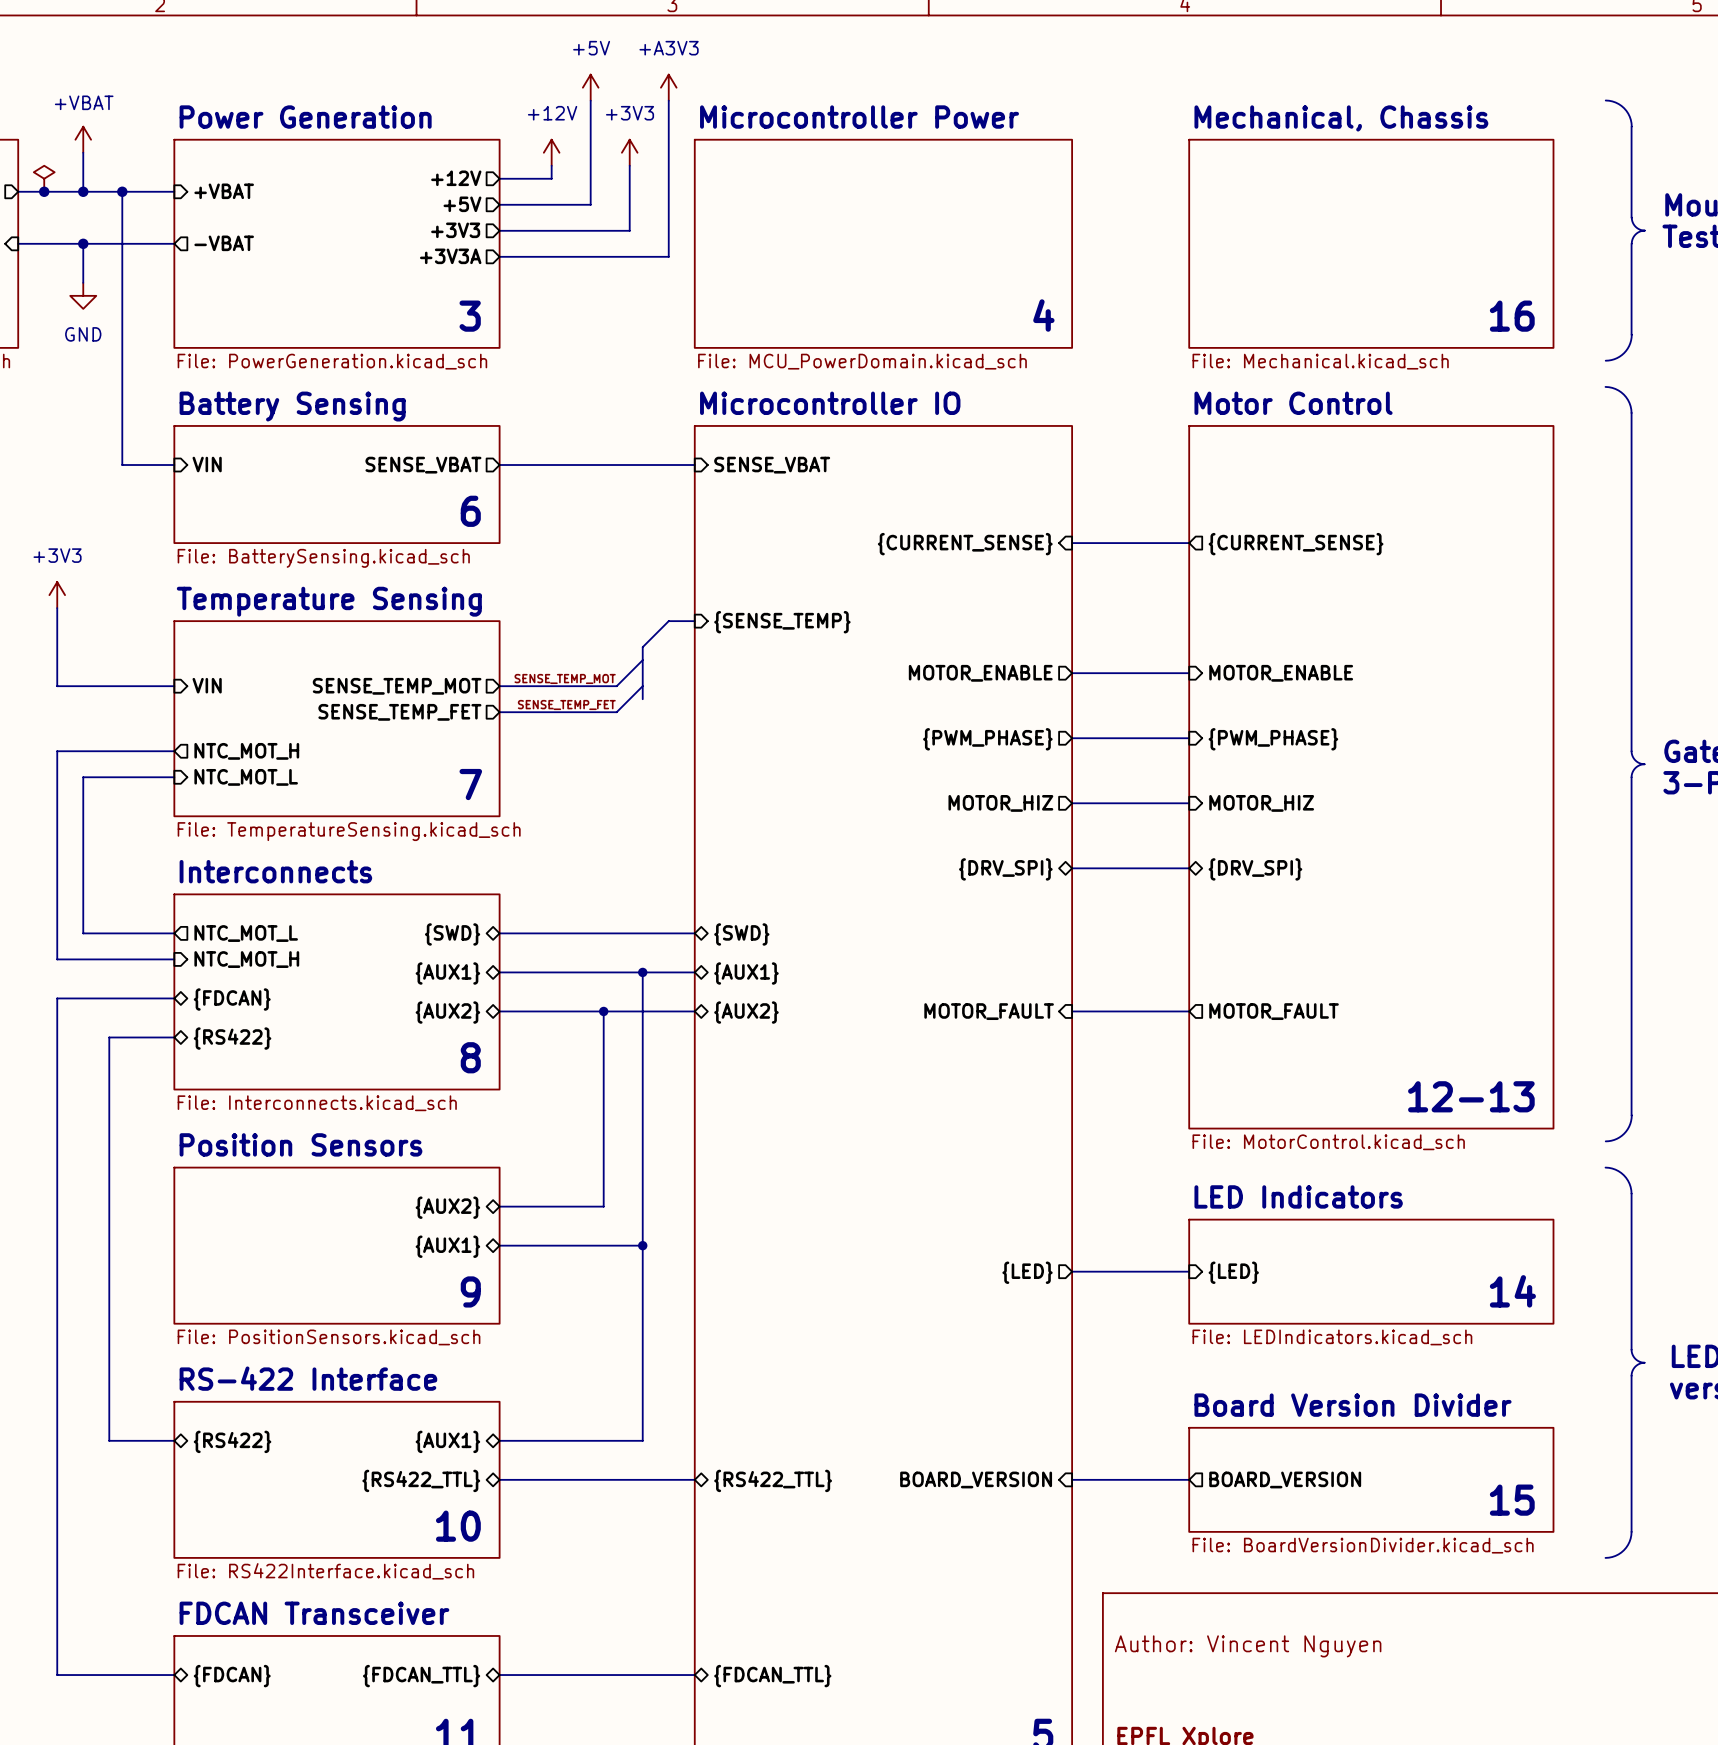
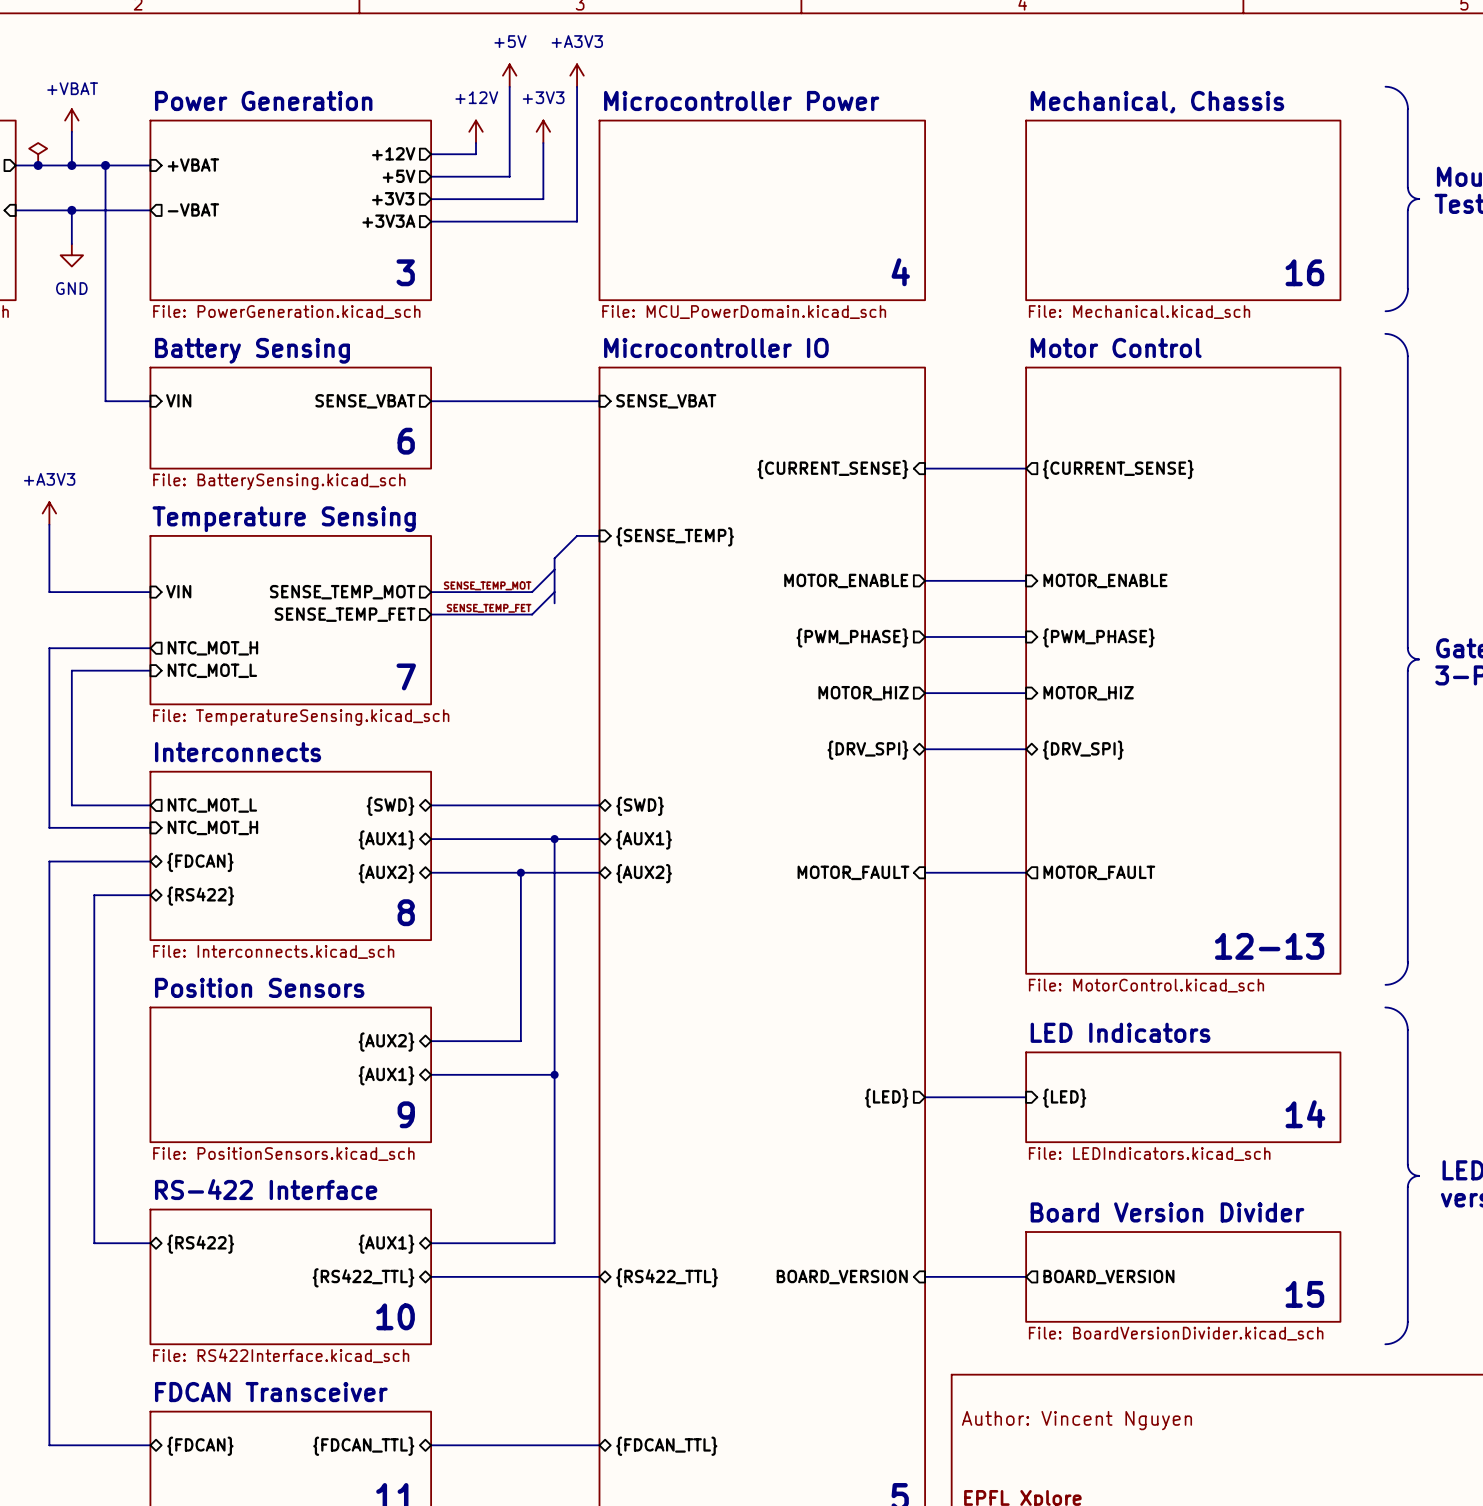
power symbol: +3V3 (57, 595) -> +A3V3 (49, 513)

